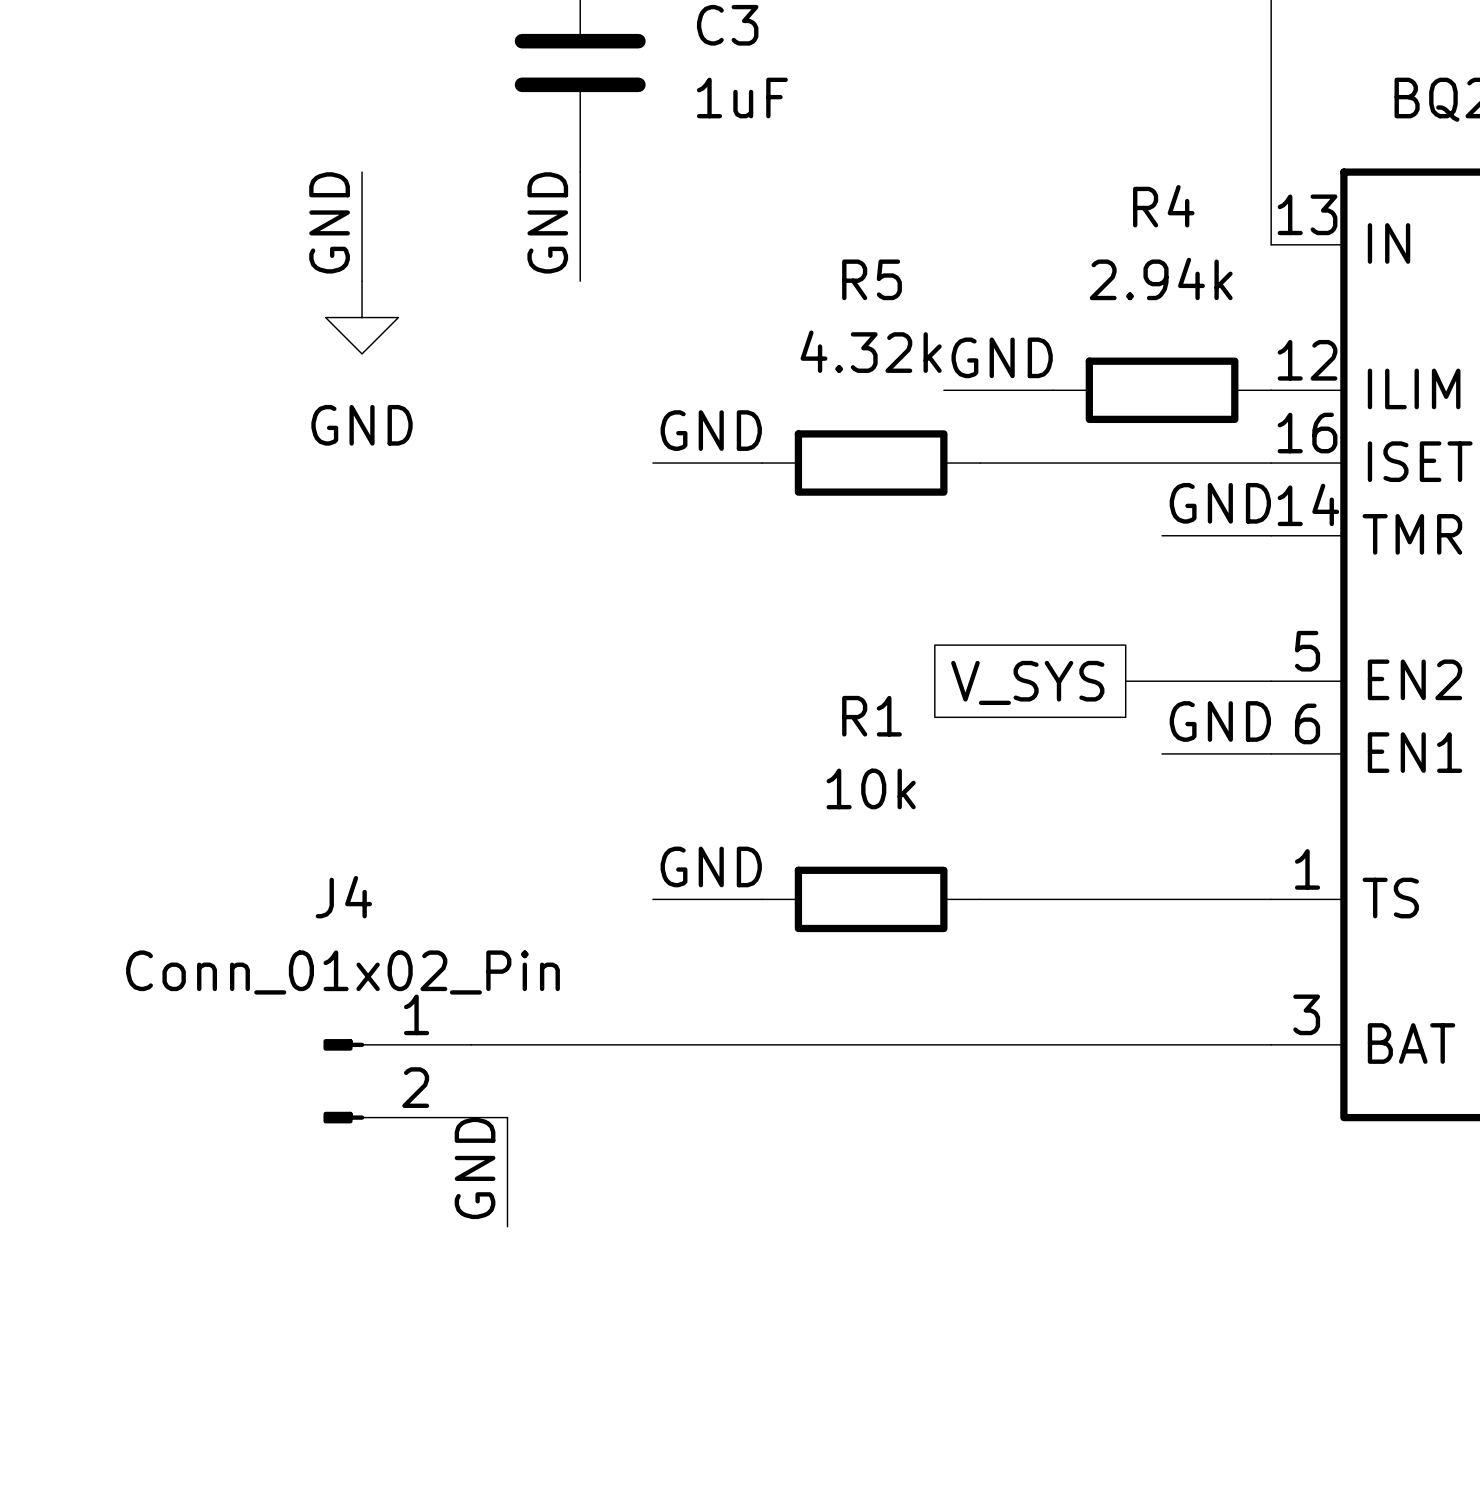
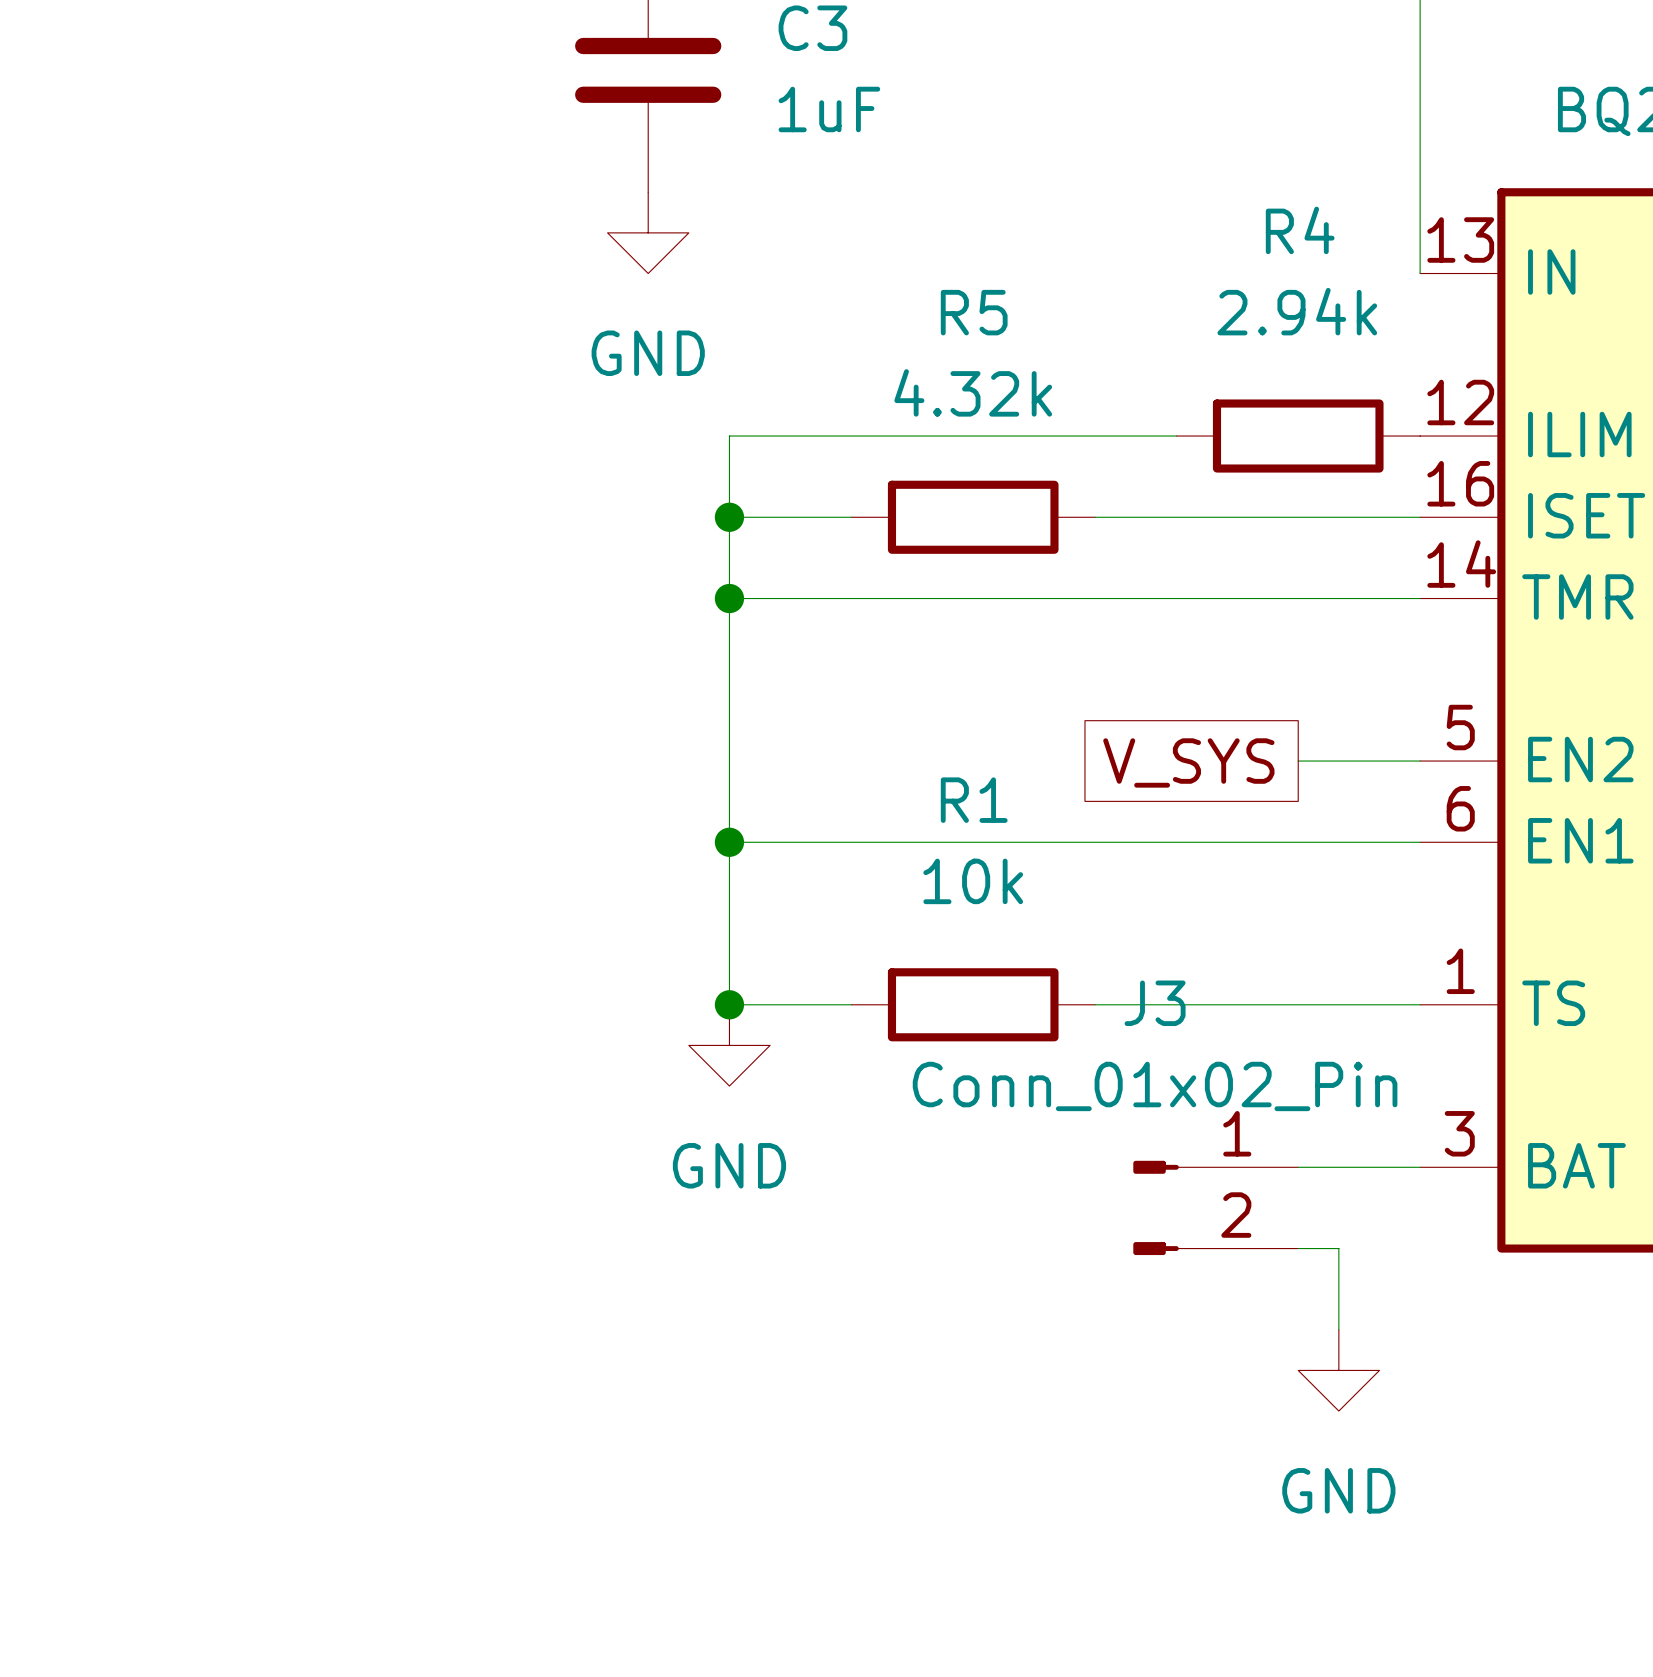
wire: (362, 172) (362, 281) -> none
wire: (580, 172) (580, 281) -> none
label: GND (329, 222) -> none
label: GND (547, 222) -> none
power symbol position: GND (362, 317) -> GND (648, 232)
label: GND (1002, 357) -> none
wire: none -> (1054, 436) (729, 436) (729, 1004)
label: GND (711, 430) -> none
junction: none -> (729, 517)
label: GND (1220, 503) -> none
wire: none -> (729, 598) (1298, 598)
junction: none -> (729, 598)
wire: (1125, 681) (1162, 681) -> none
global label position: V_SYS (1027, 682) -> V_SYS (1188, 762)
label: GND (1220, 721) -> none
wire: none -> (729, 842) (1298, 842)
junction: none -> (729, 842)
label: GND (711, 866) -> none
junction: none -> (729, 1004)
power symbol: none -> GND (729, 1045)
wire: (471, 1044) (1162, 1044) -> none
J4: Conn_01x02_Pin (397, 1081) -> none
J3: none -> Conn_01x02_Pin (1215, 1207)
wire: (471, 1117) (507, 1117) (507, 1226) -> none
wire: none -> (1298, 1248) (1338, 1248) (1338, 1329)
label: GND (475, 1168) -> none
power symbol: none -> GND (1338, 1370)

